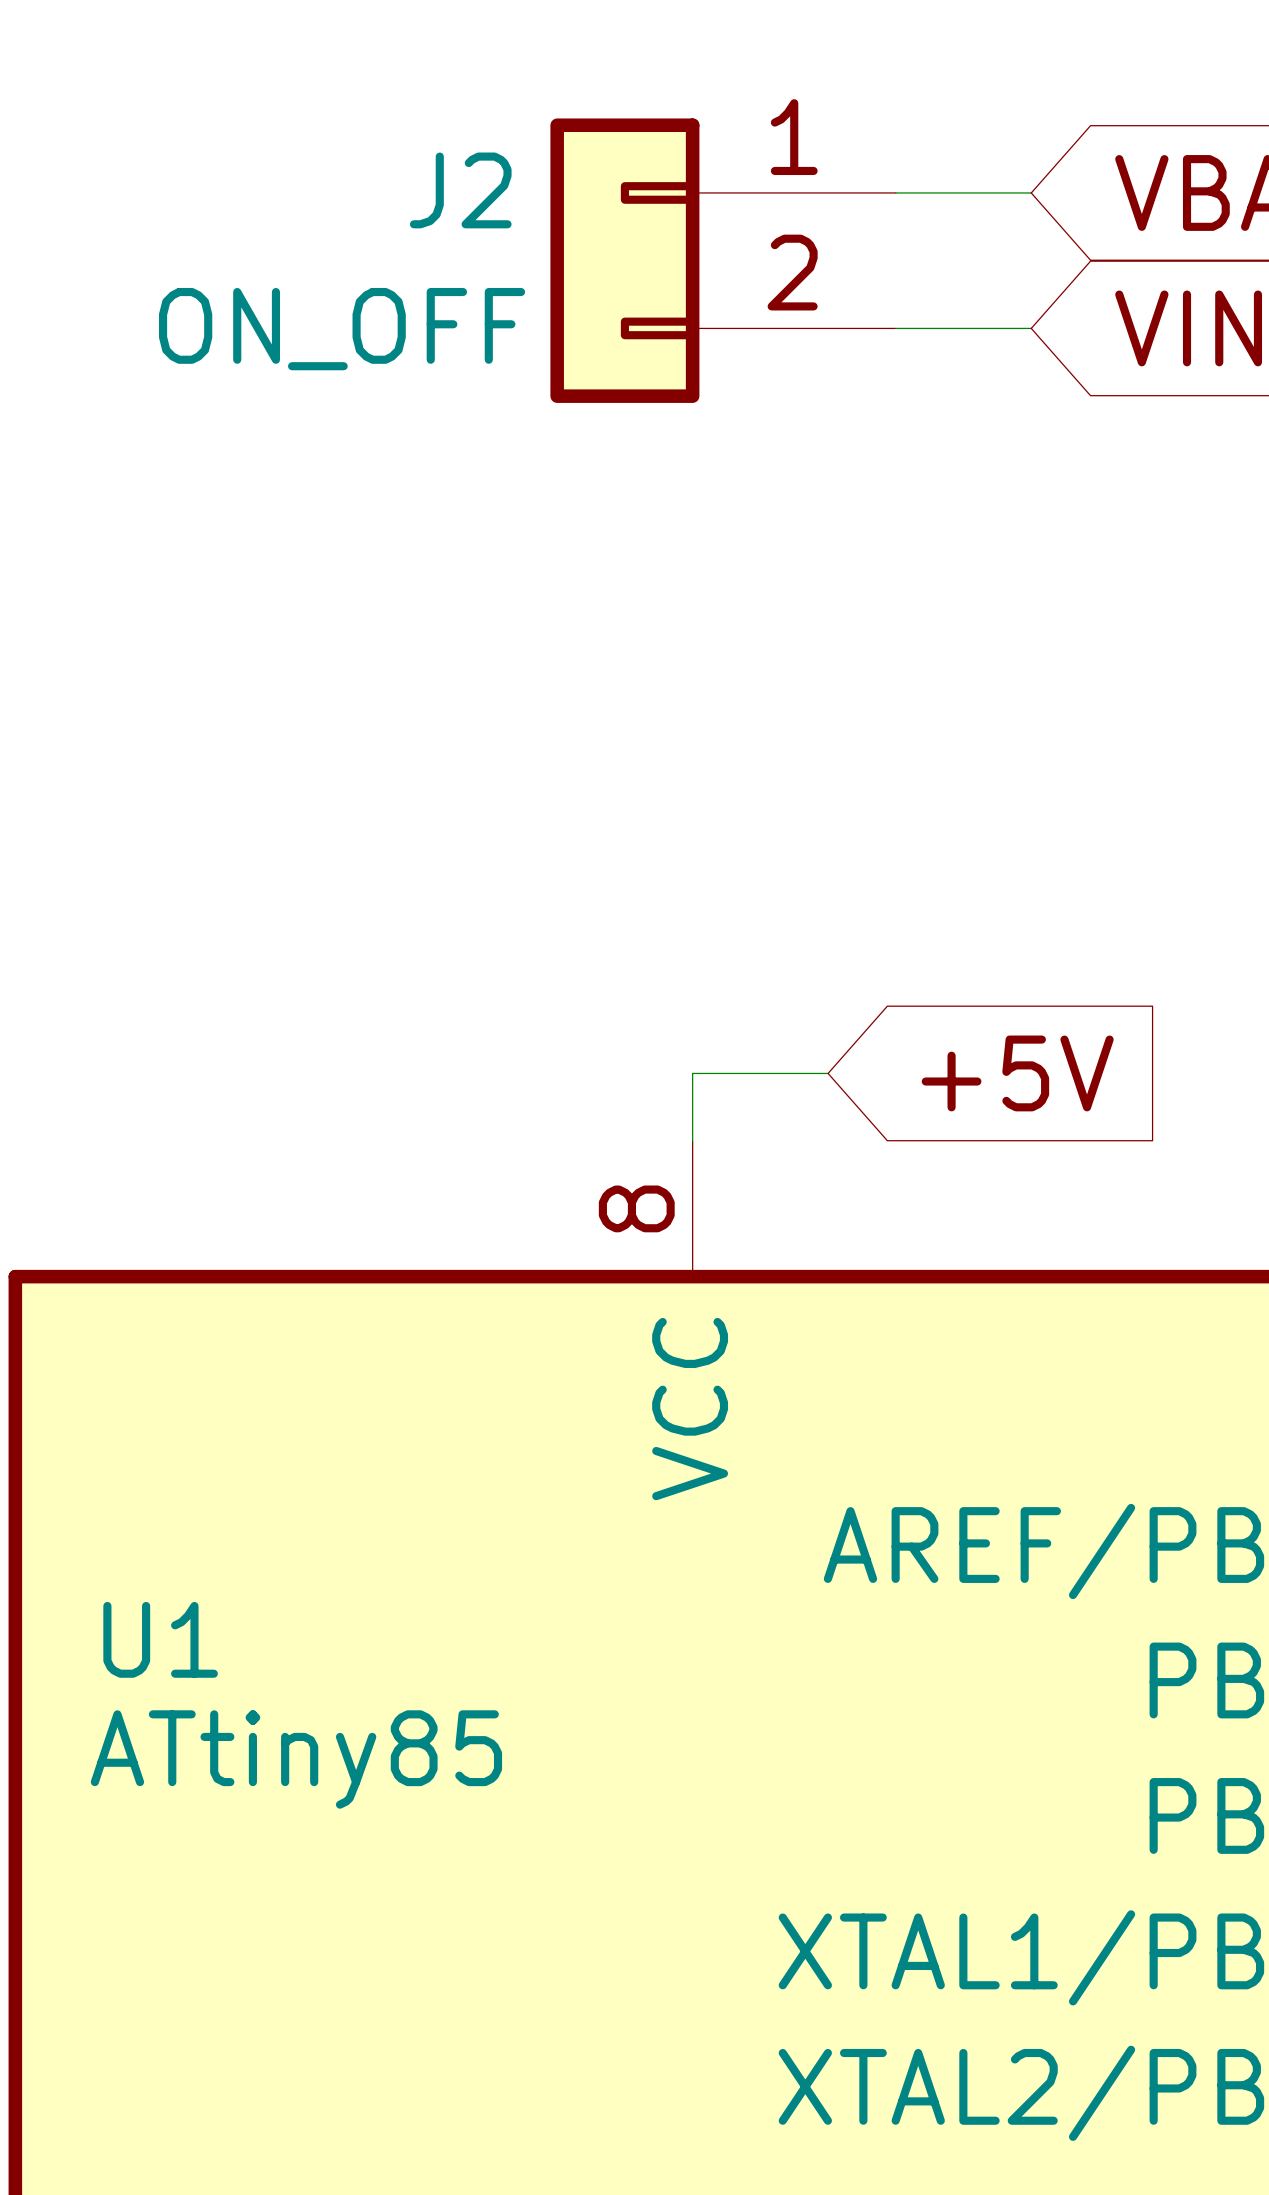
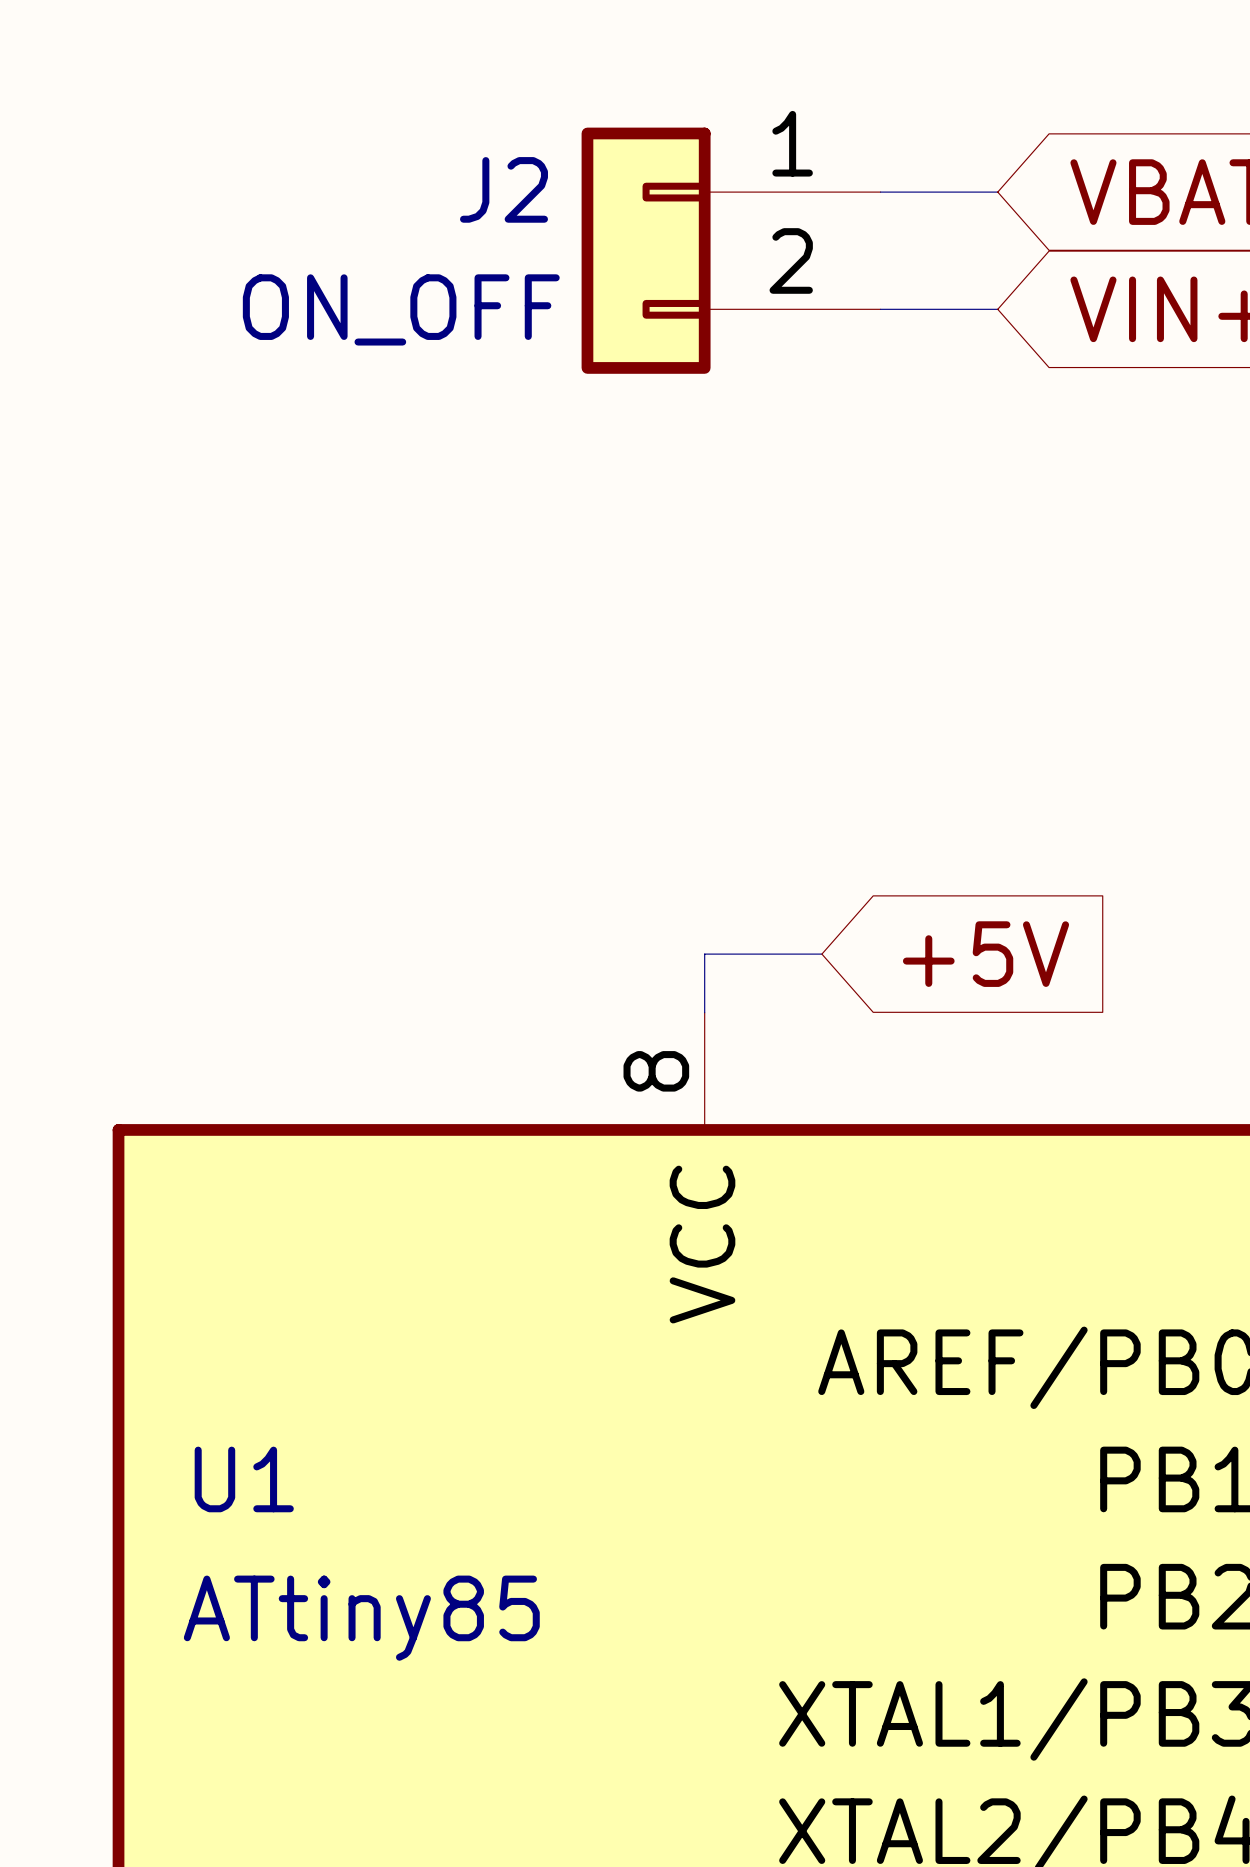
U1 name position: U1 (160, 1639) -> U1 (244, 1479)
U1 value position: ATtiny85 (296, 1759) -> ATtiny85 (361, 1618)

